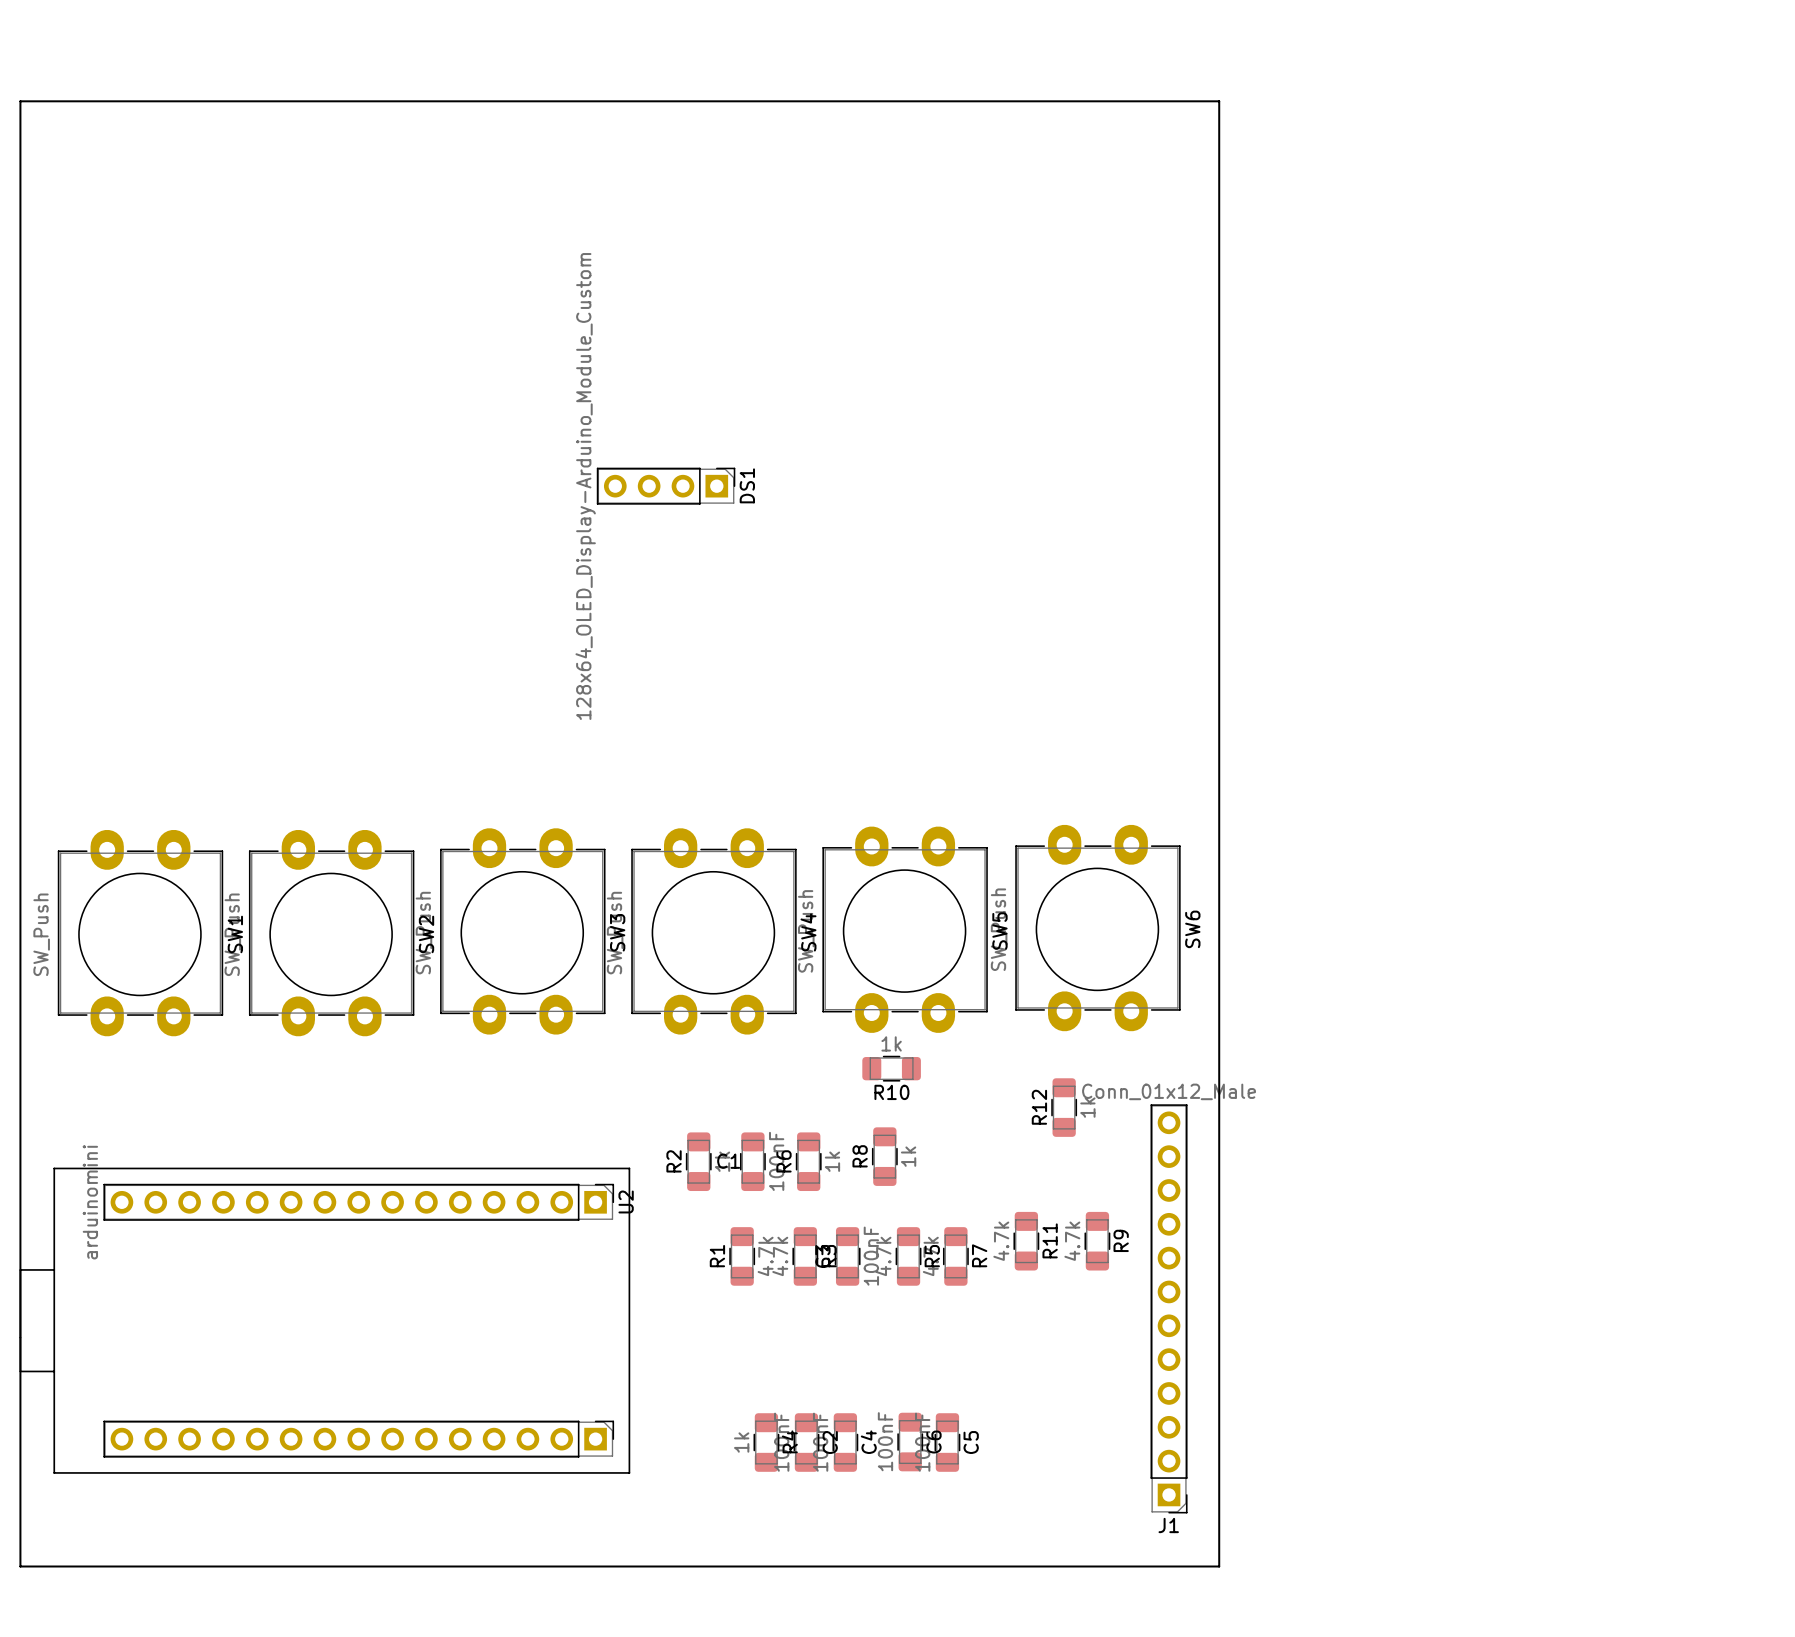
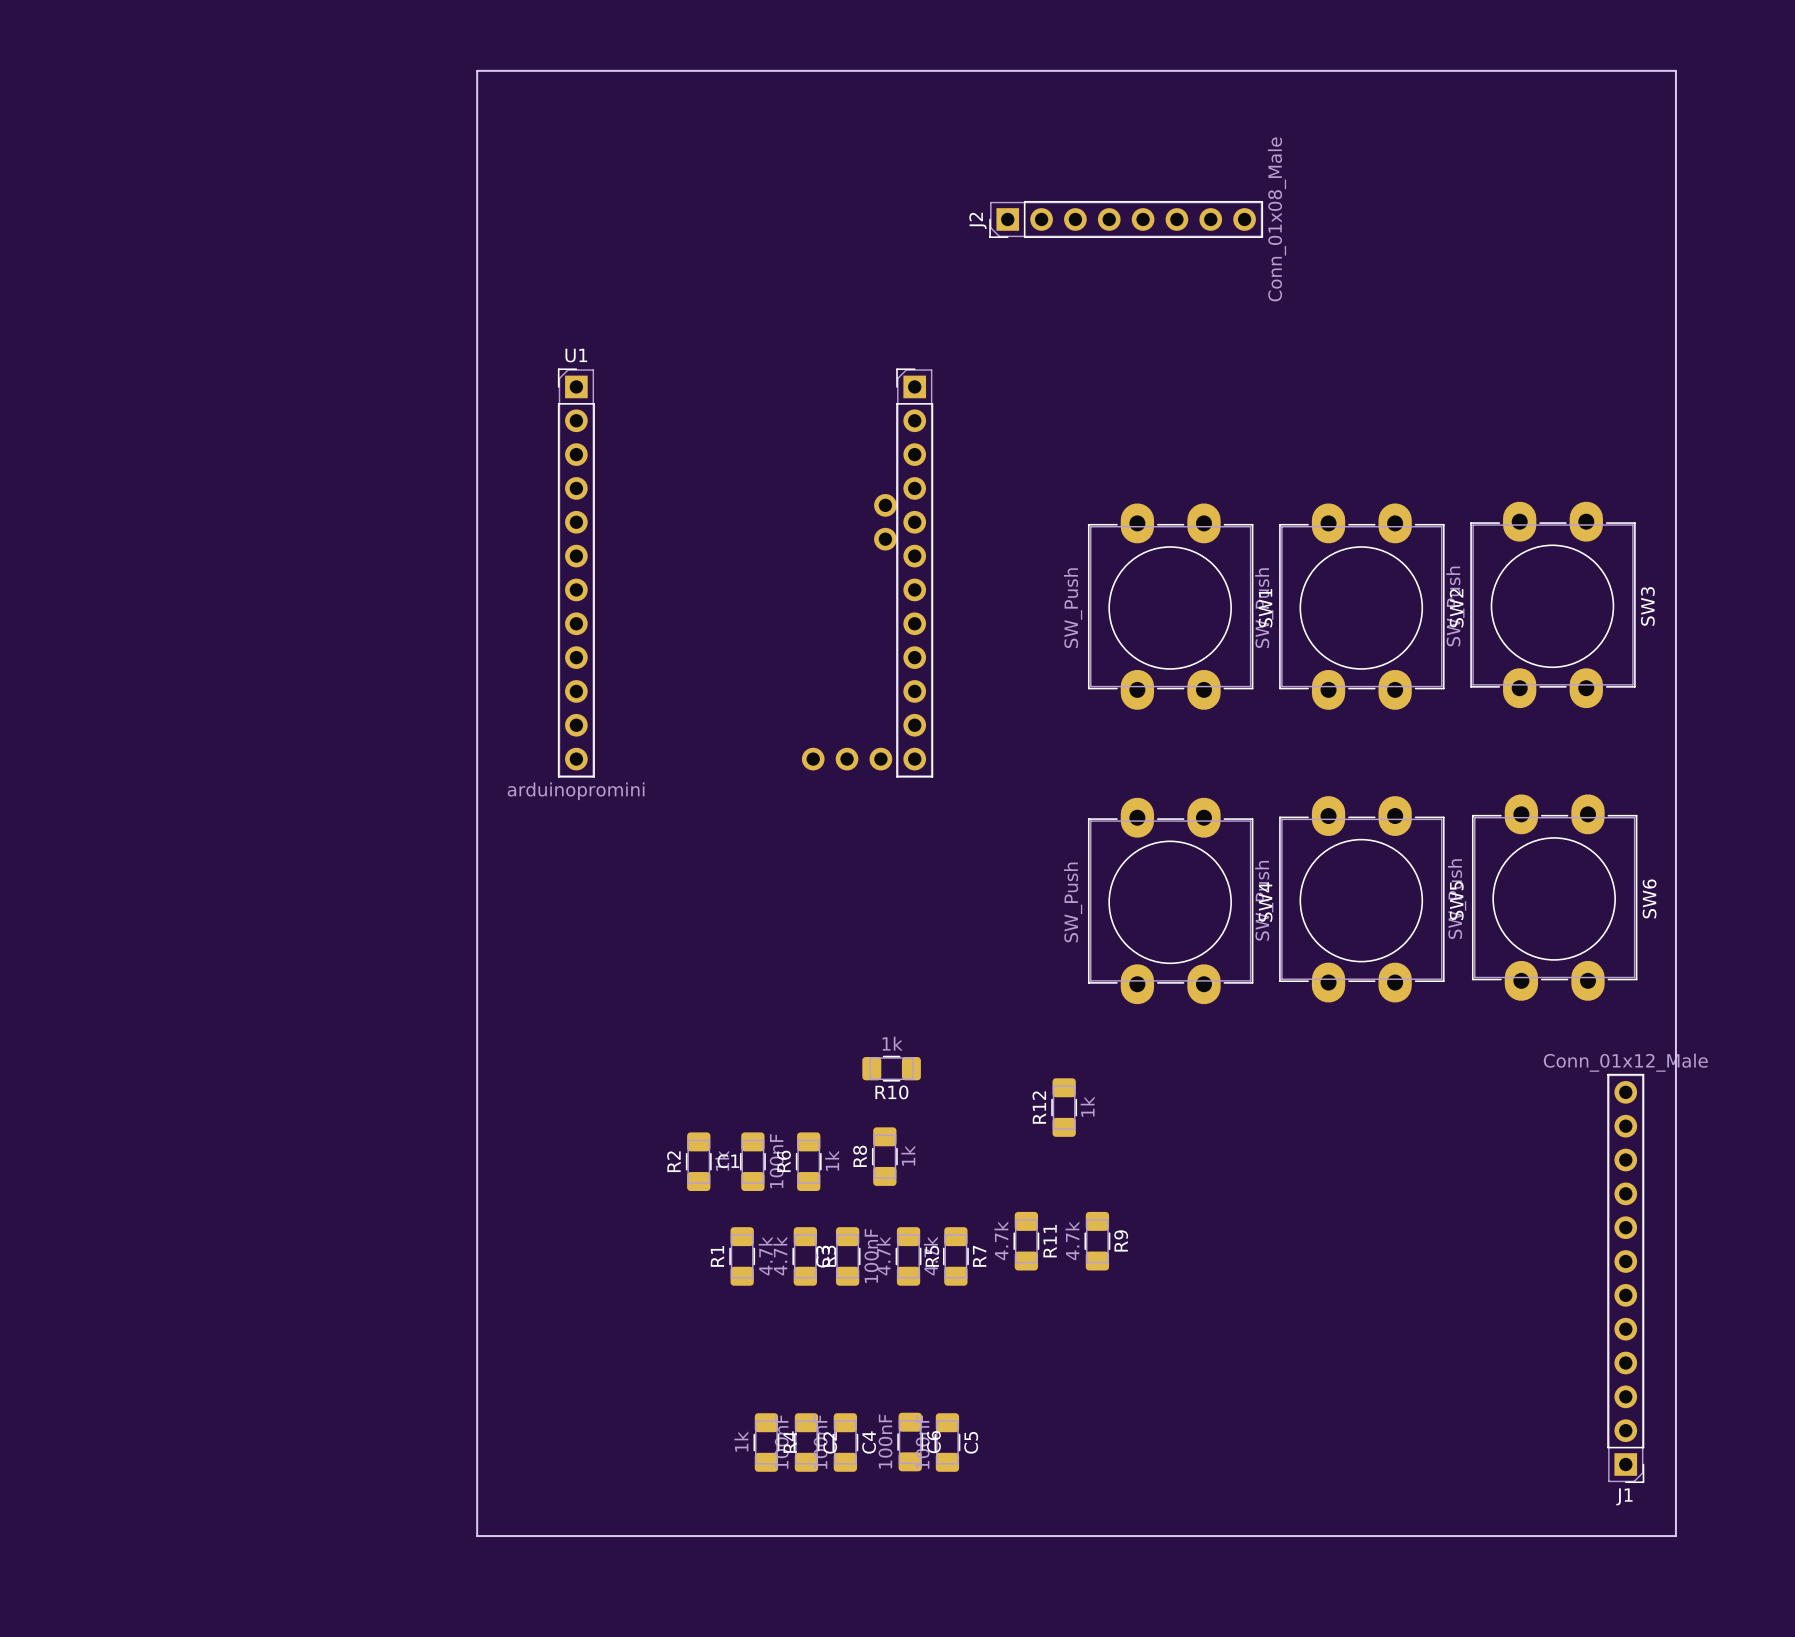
board edge: none -> (477, 70) (1675, 70) (1675, 1536) (477, 1536) (477, 70)
board edge: (20, 101) (1219, 101) (1219, 1566) (20, 1566) (20, 101) -> none
J2: none -> Conn_01x08_Male (1126, 219)
DS1: 128x64_OLED_Display-Arduino_Module_Custom (666, 486) -> none
U1: none -> arduinopromini (745, 573)
SW6 position: (1097, 928) -> (1554, 897)
SW5 position: (905, 929) -> (1361, 899)
SW3 position: (522, 931) -> (1552, 604)
SW4 position: (713, 931) -> (1170, 900)
SW1 position: (140, 933) -> (1170, 606)
SW2 position: (331, 933) -> (1361, 606)
J1 position: (1169, 1308) -> (1625, 1278)
U2: arduinomini (324, 1320) -> none

